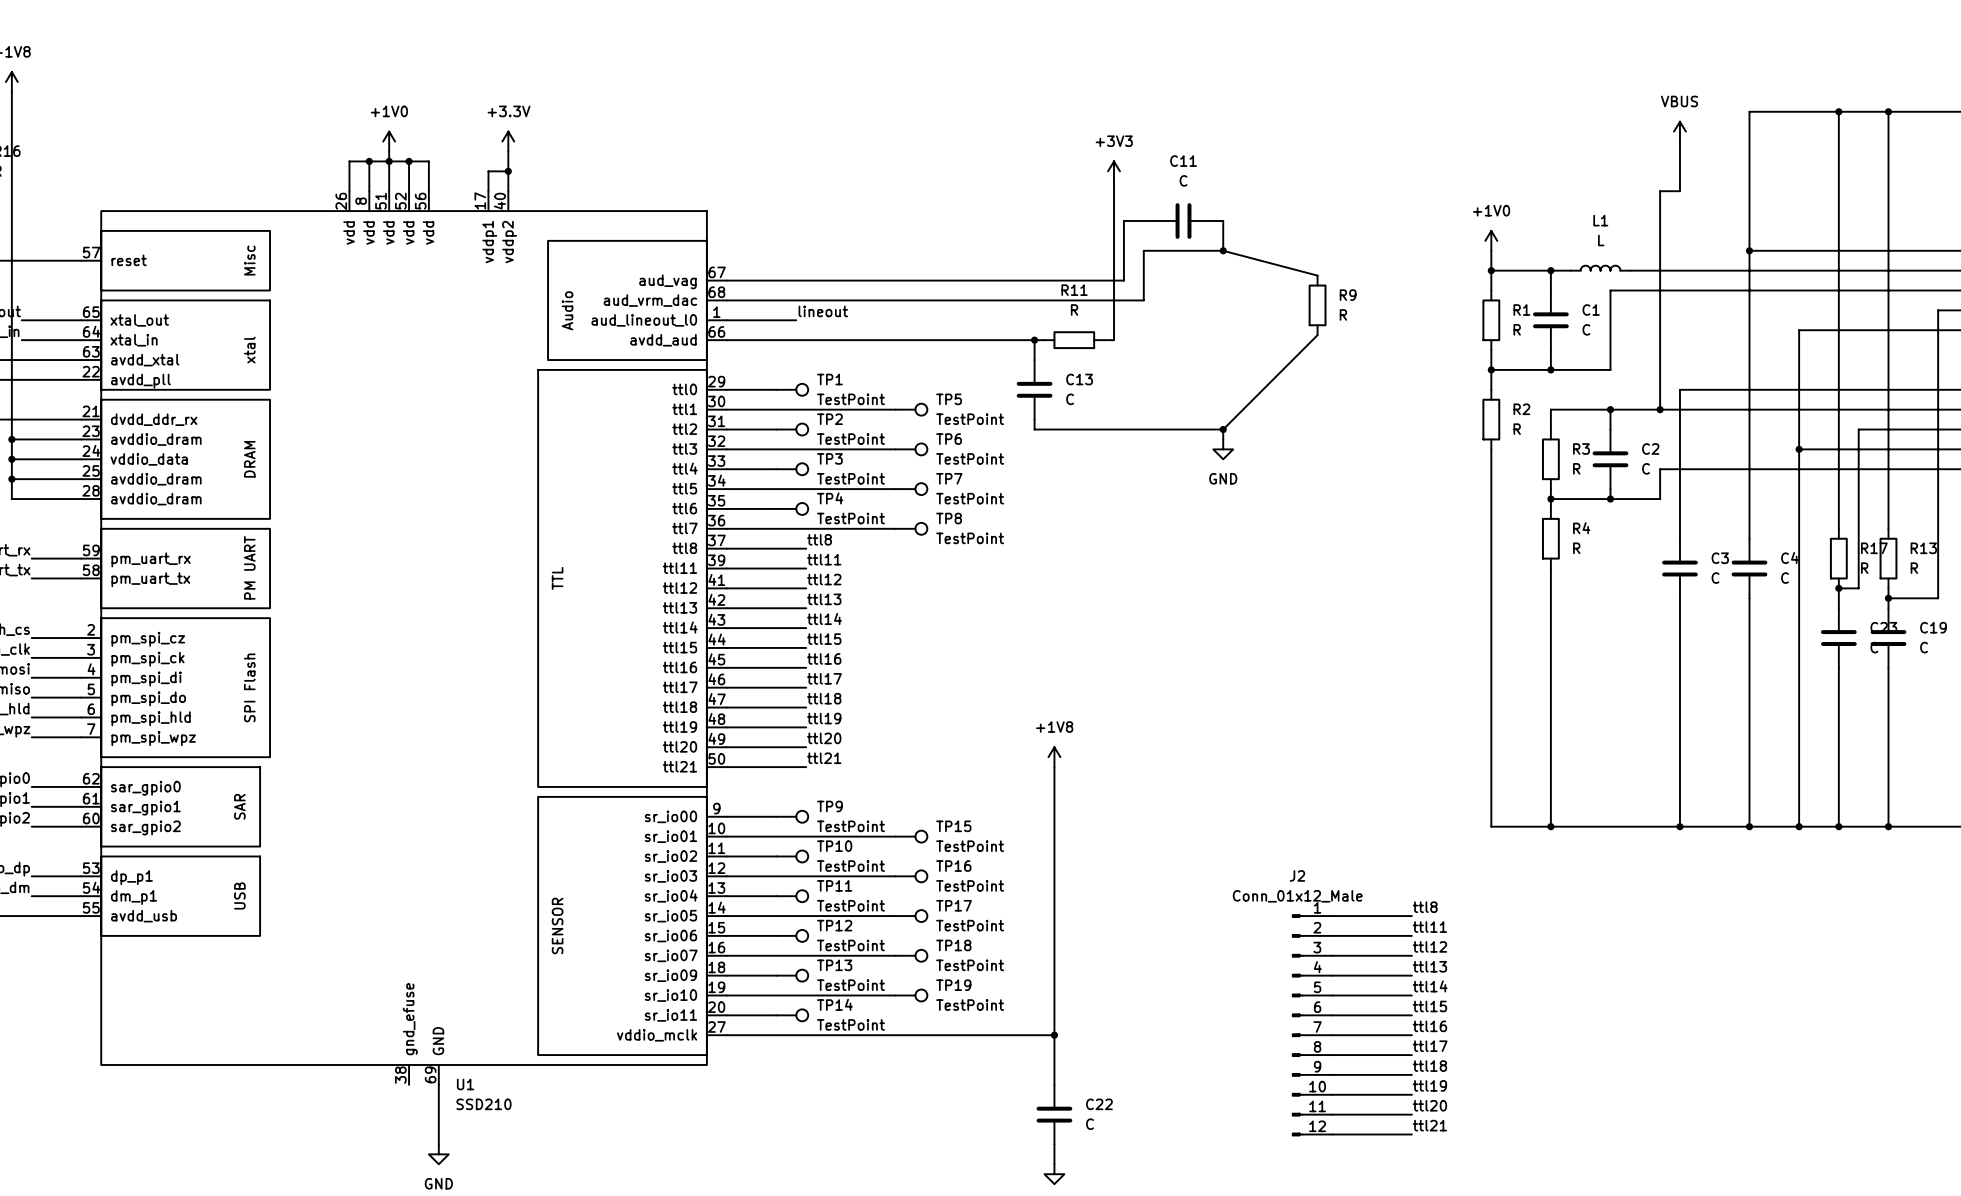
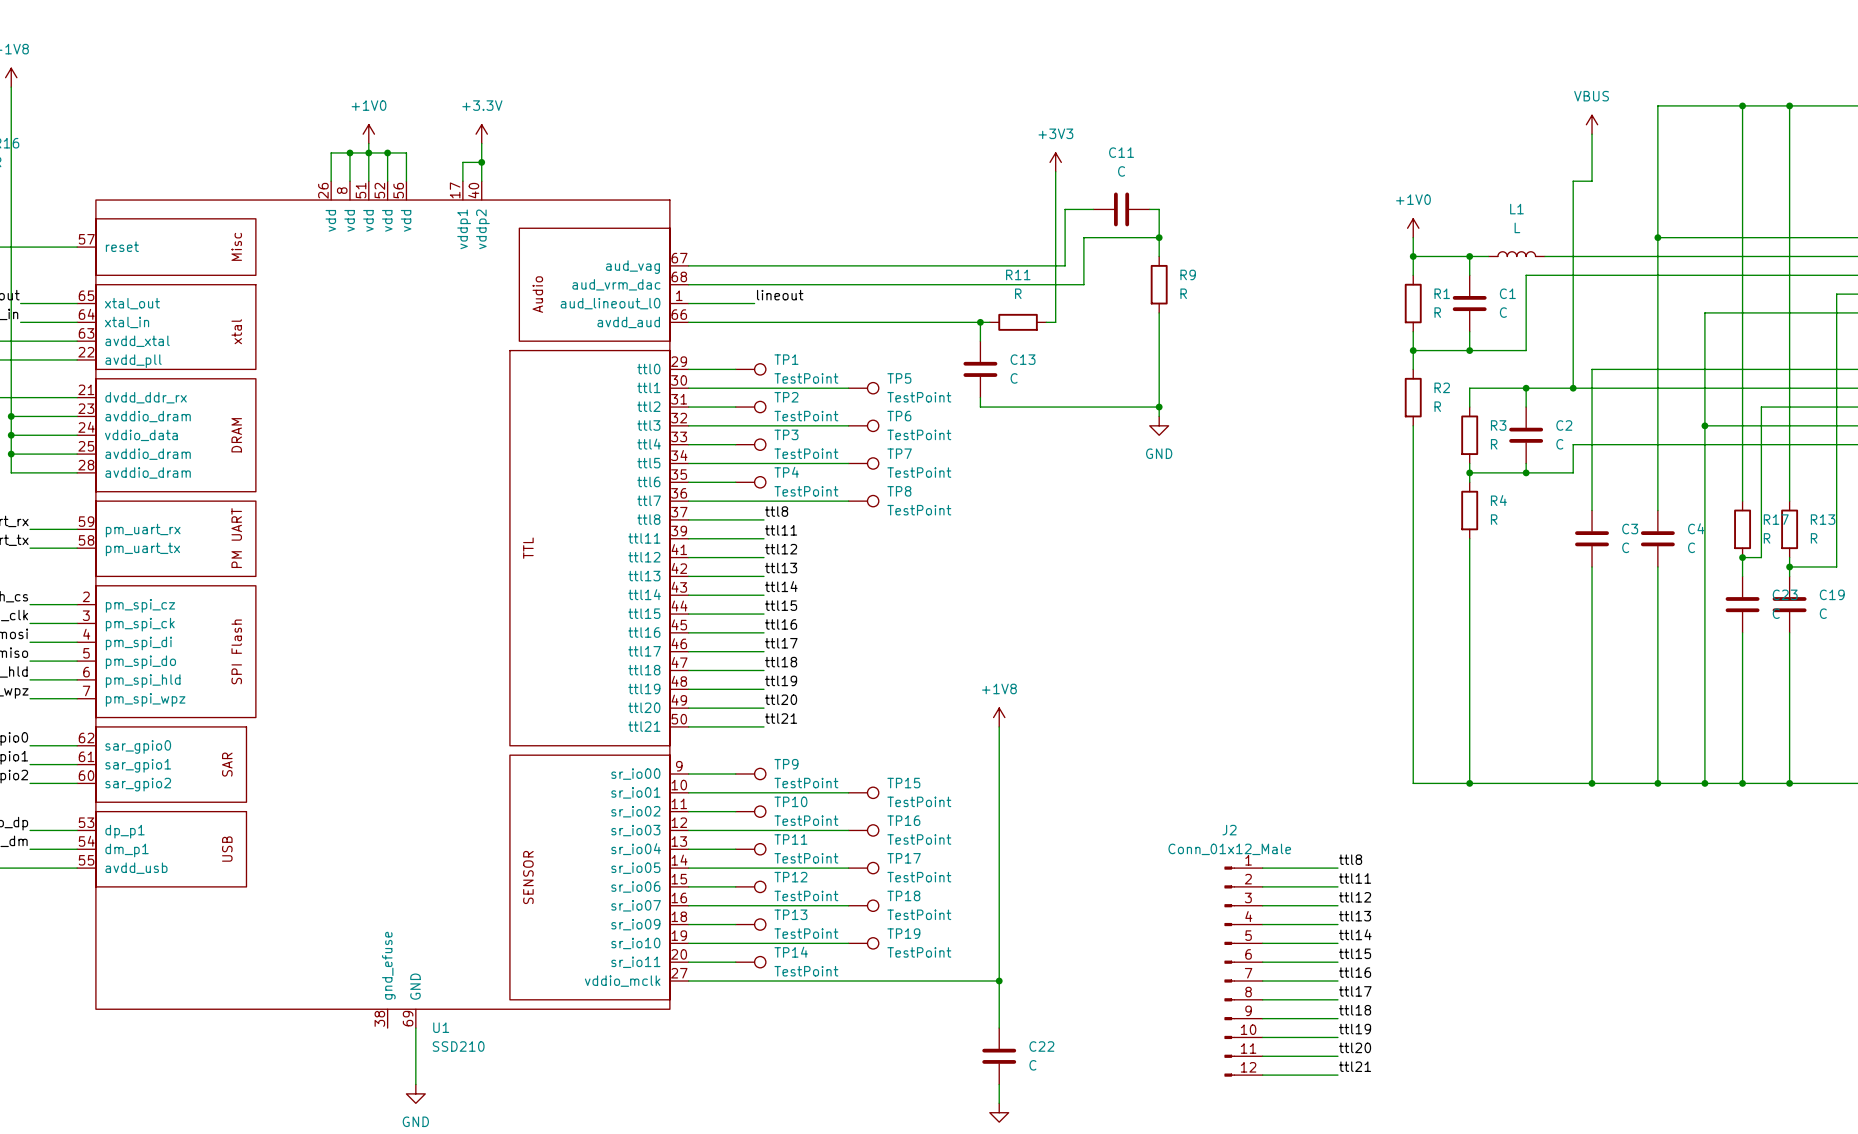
wire: (1223, 250) (1317, 275) -> (1159, 237) (1159, 256)
R9 position: (1317, 305) -> (1159, 284)
wire: (1317, 335) (1223, 429) -> (1159, 312) (1159, 407)

